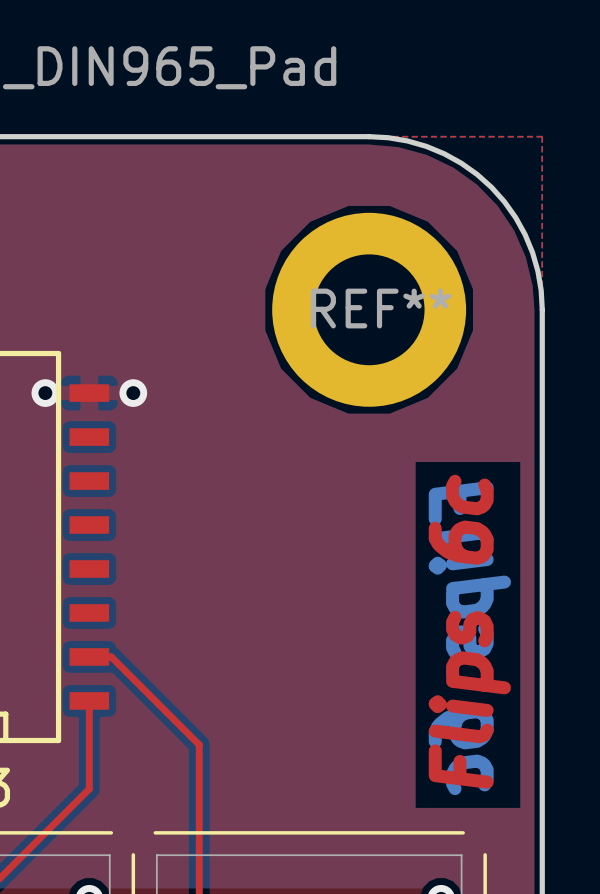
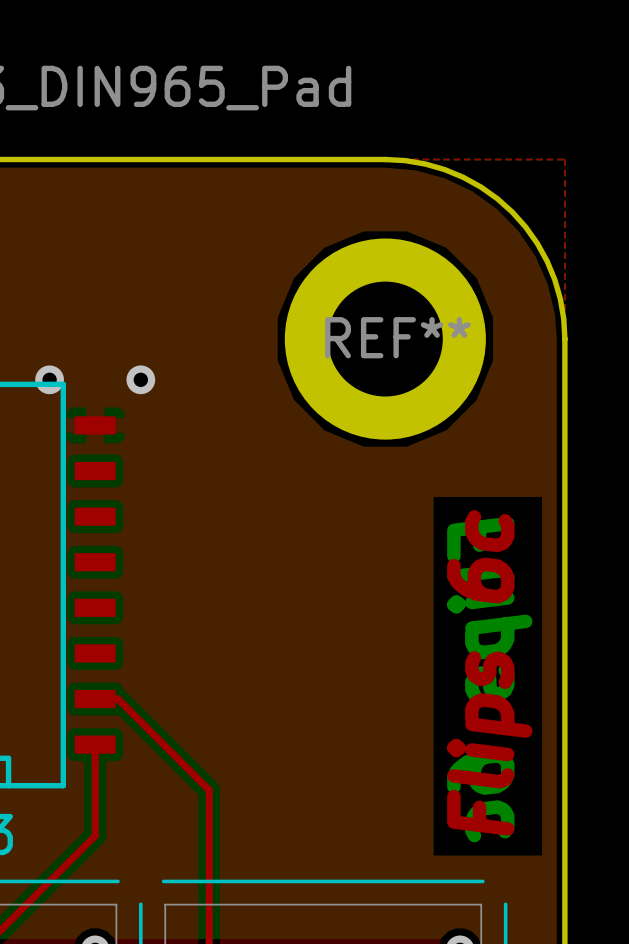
via position: (45, 393) -> (49, 379)
via position: (133, 393) -> (140, 379)

